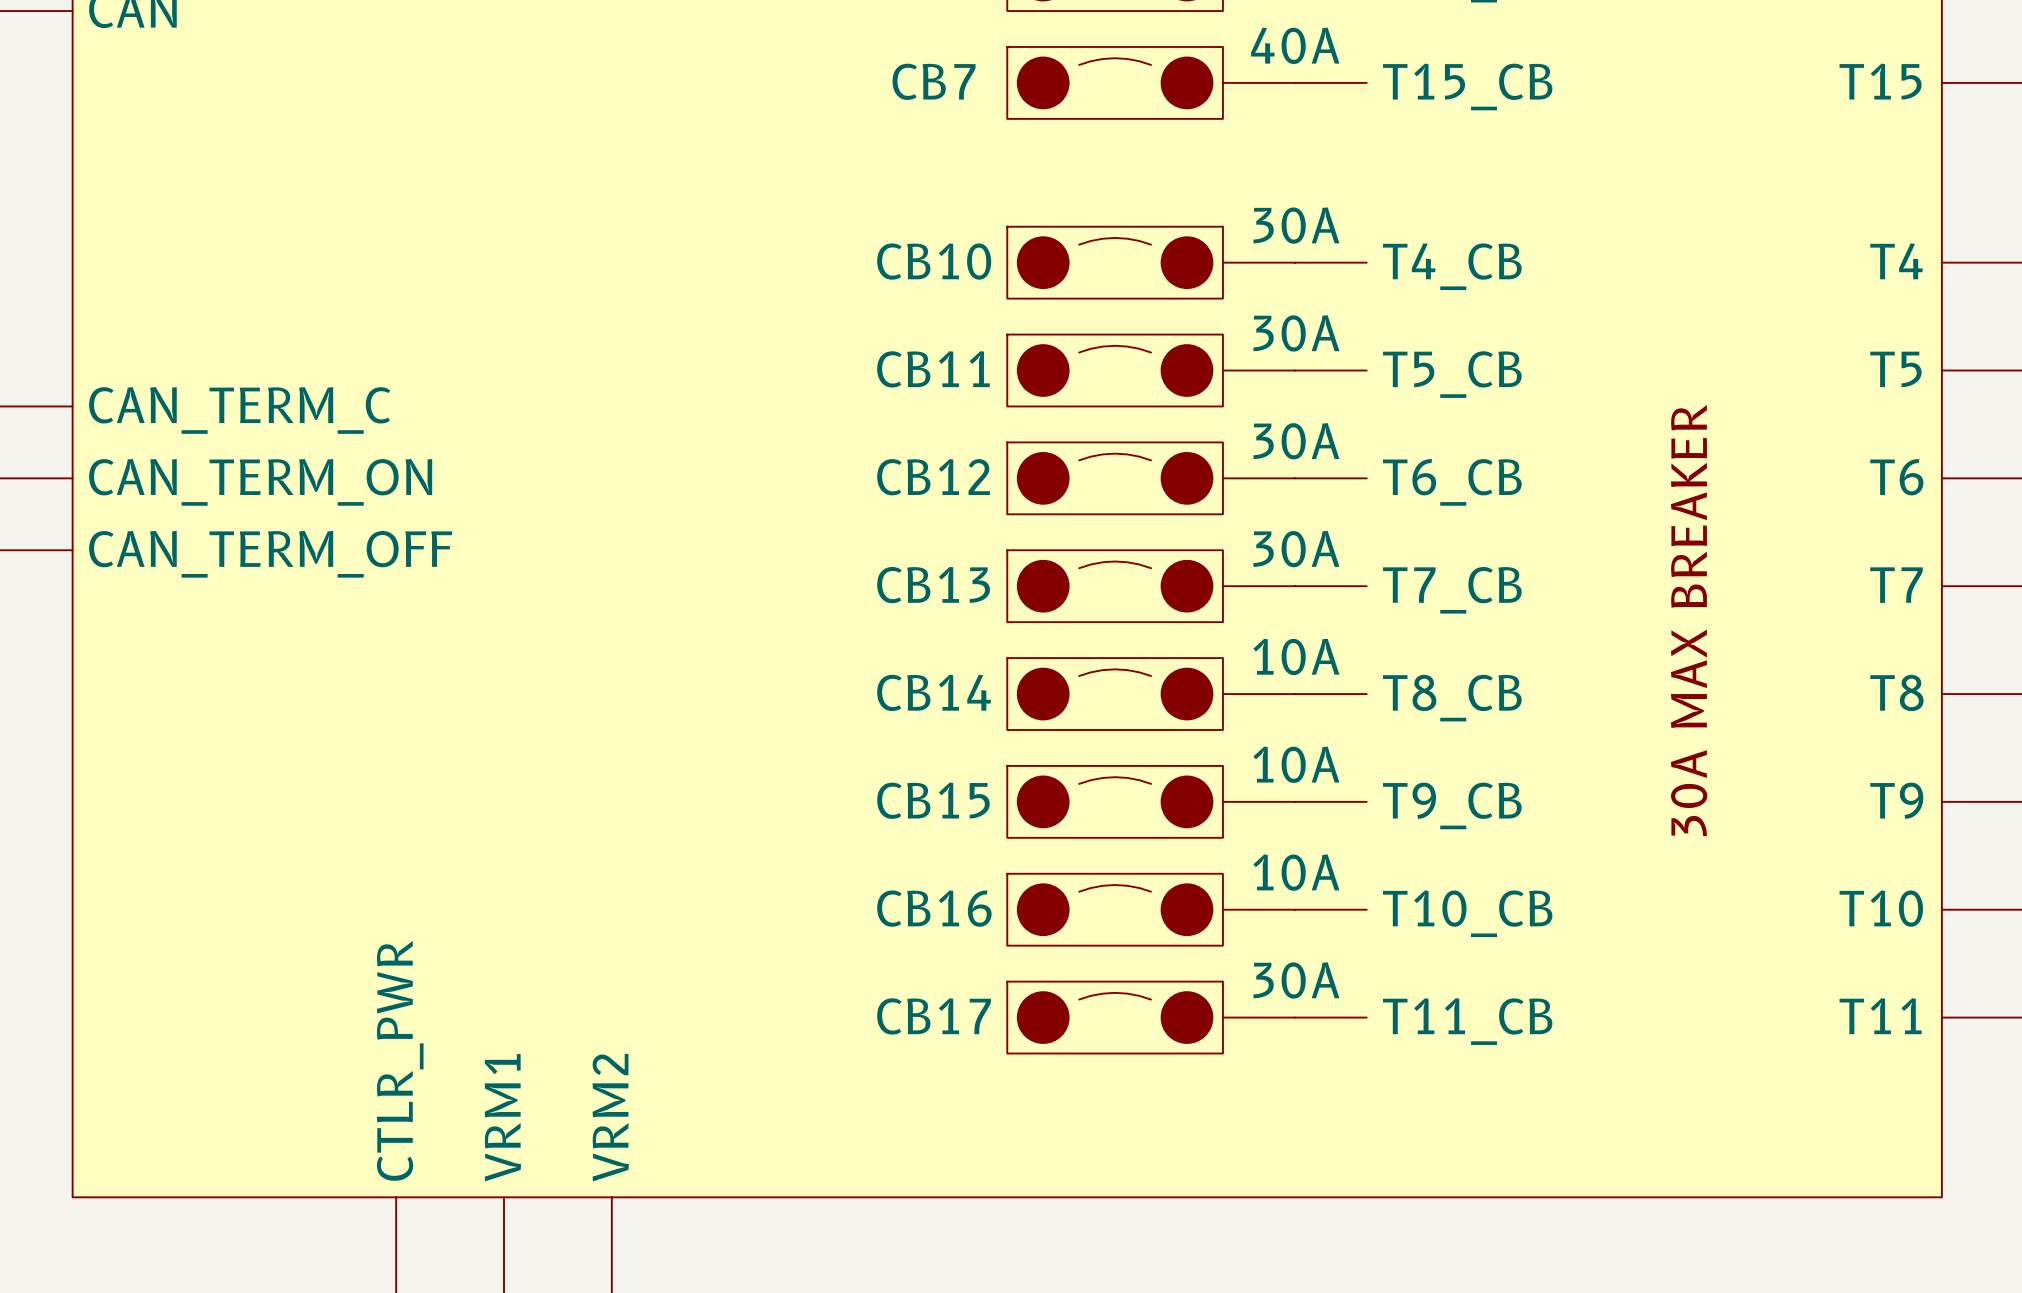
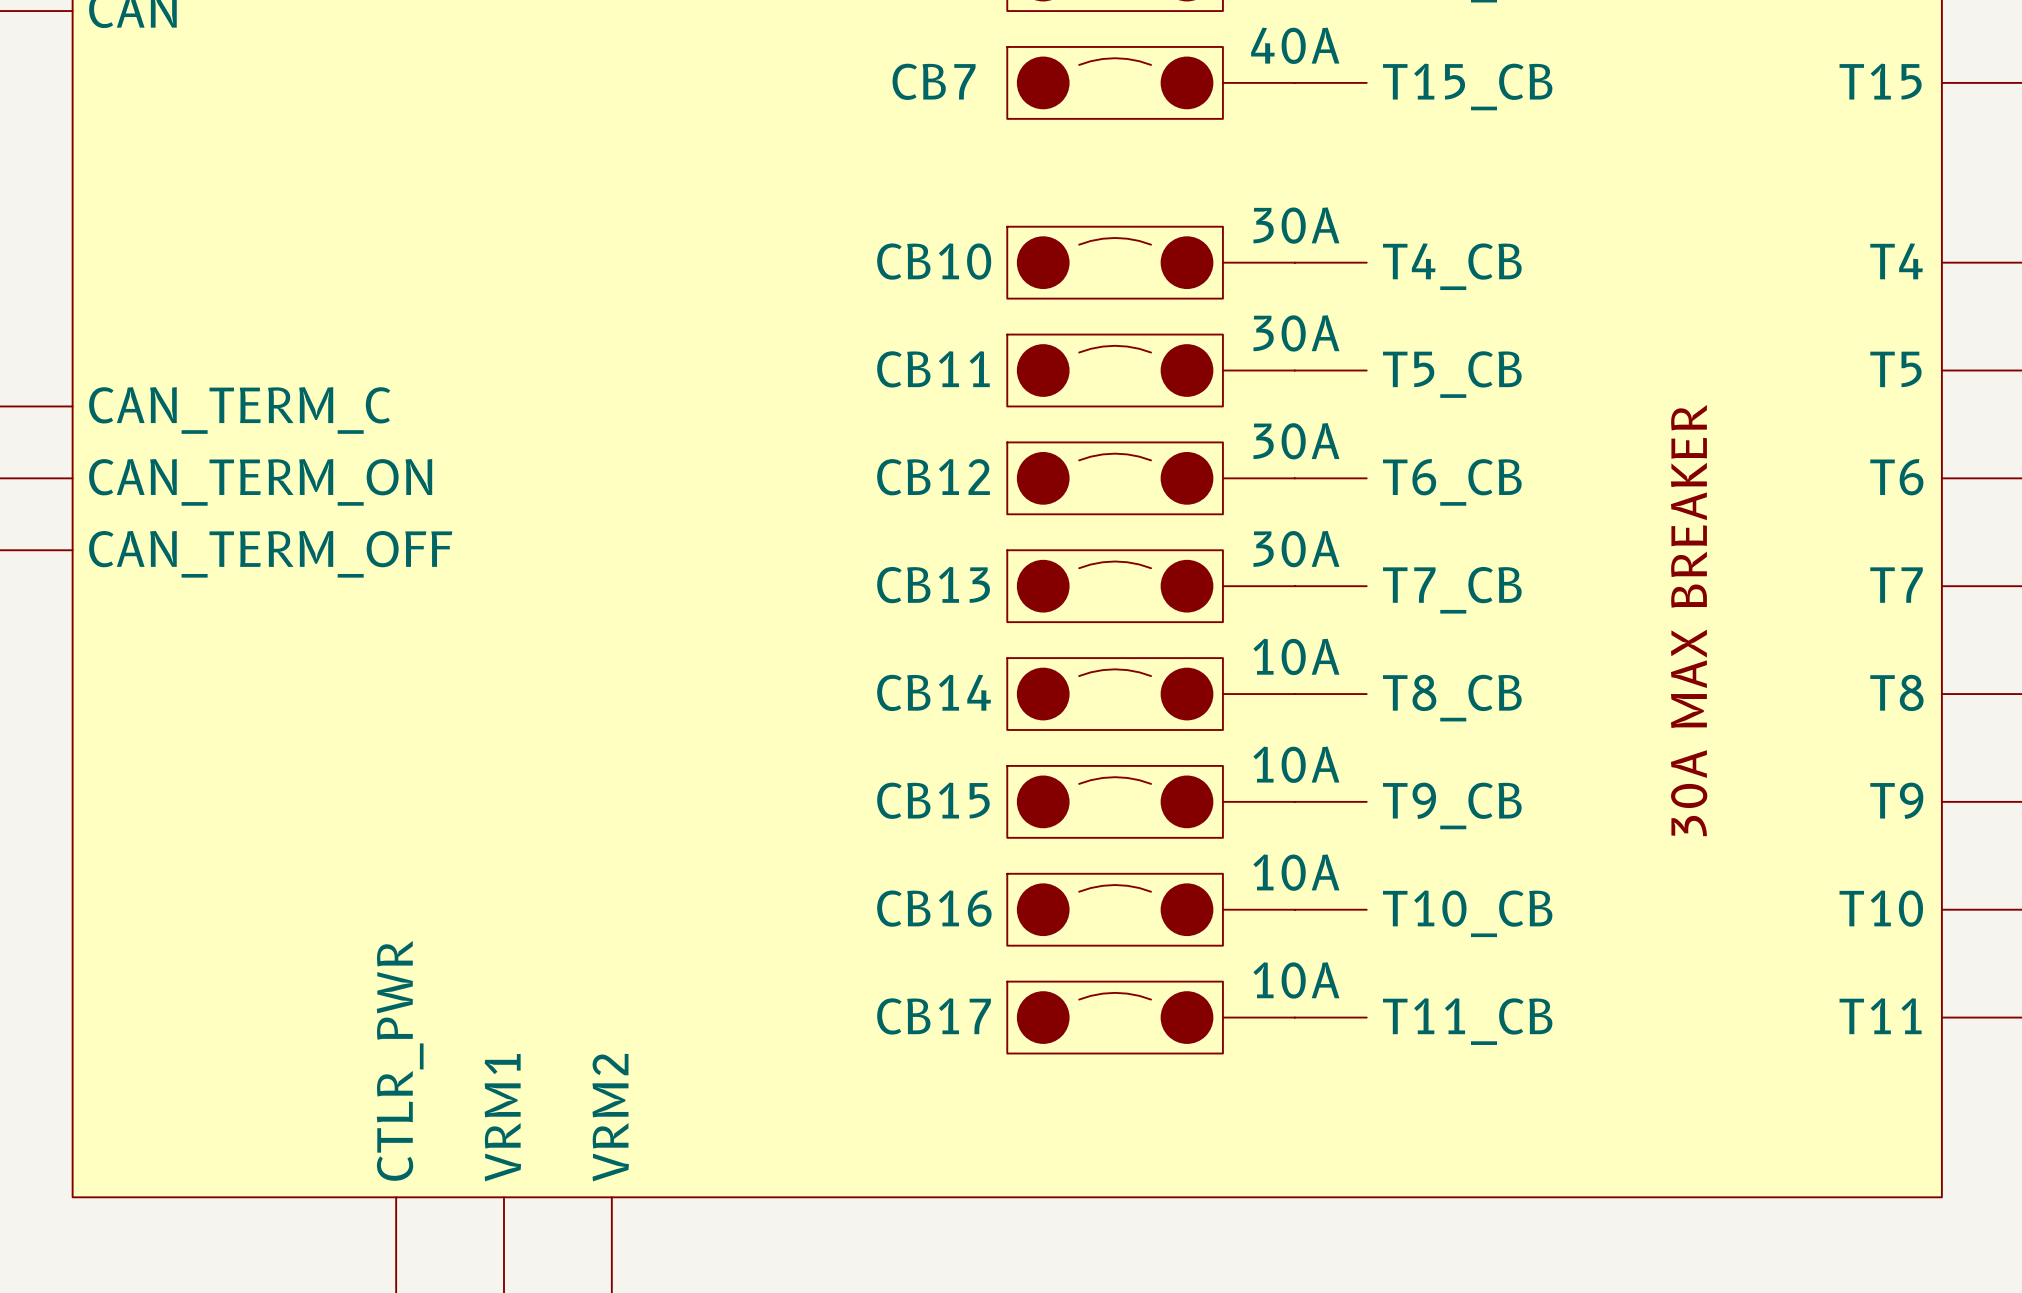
CB17 value: 30A (1296, 980) -> 10A (1296, 980)

